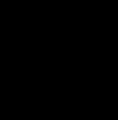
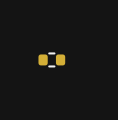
part: none -> (51, 59)

